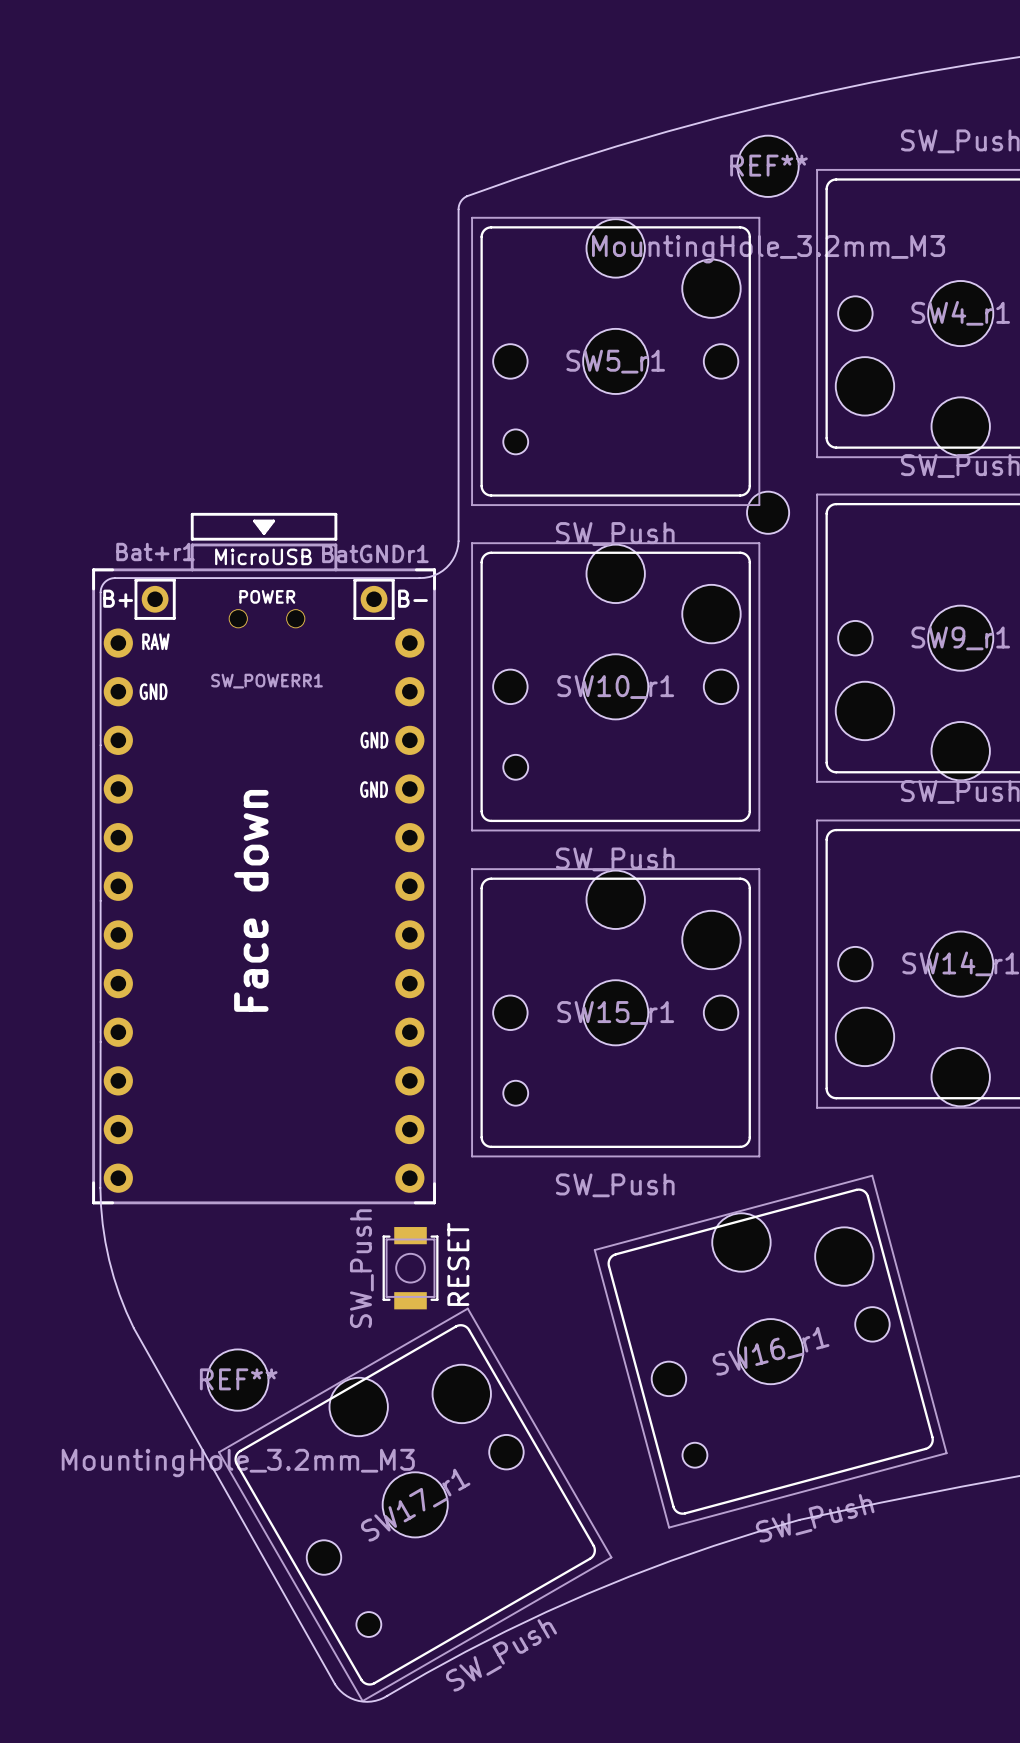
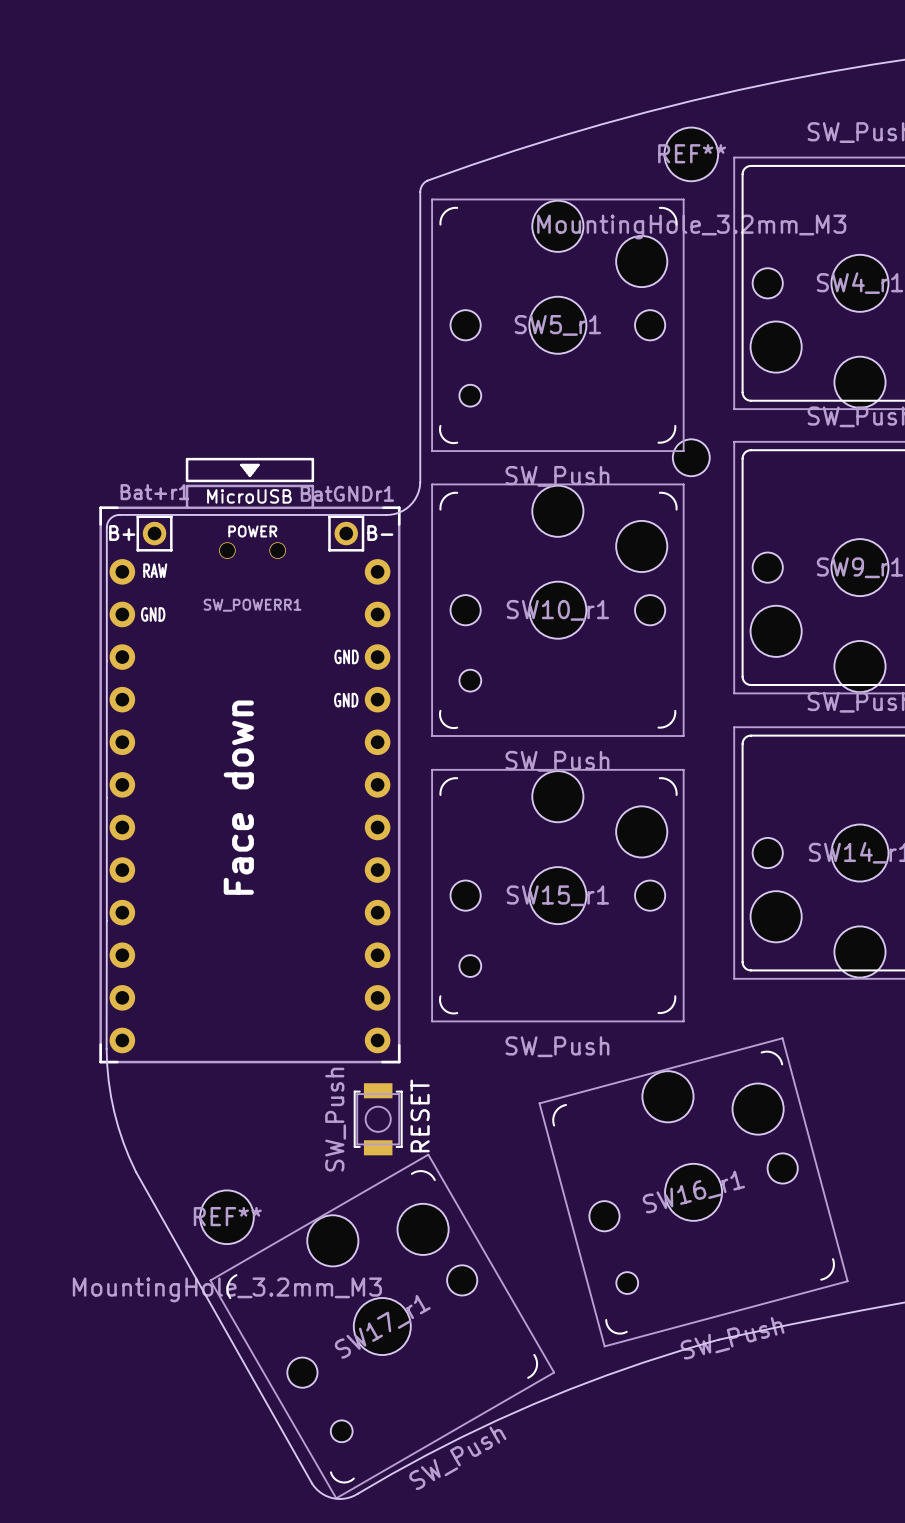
SW5_r1 footprint: [471, 216, 761, 507] -> [431, 198, 685, 452]
SW10_r1 footprint: [471, 542, 761, 832] -> [431, 483, 685, 737]
SW15_r1 footprint: [471, 868, 761, 1158] -> [431, 769, 685, 1023]
SW16_r1 footprint: [593, 1174, 948, 1529] -> [538, 1037, 849, 1348]
SW17_r1 footprint: [218, 1307, 613, 1703] -> [209, 1153, 555, 1500]

